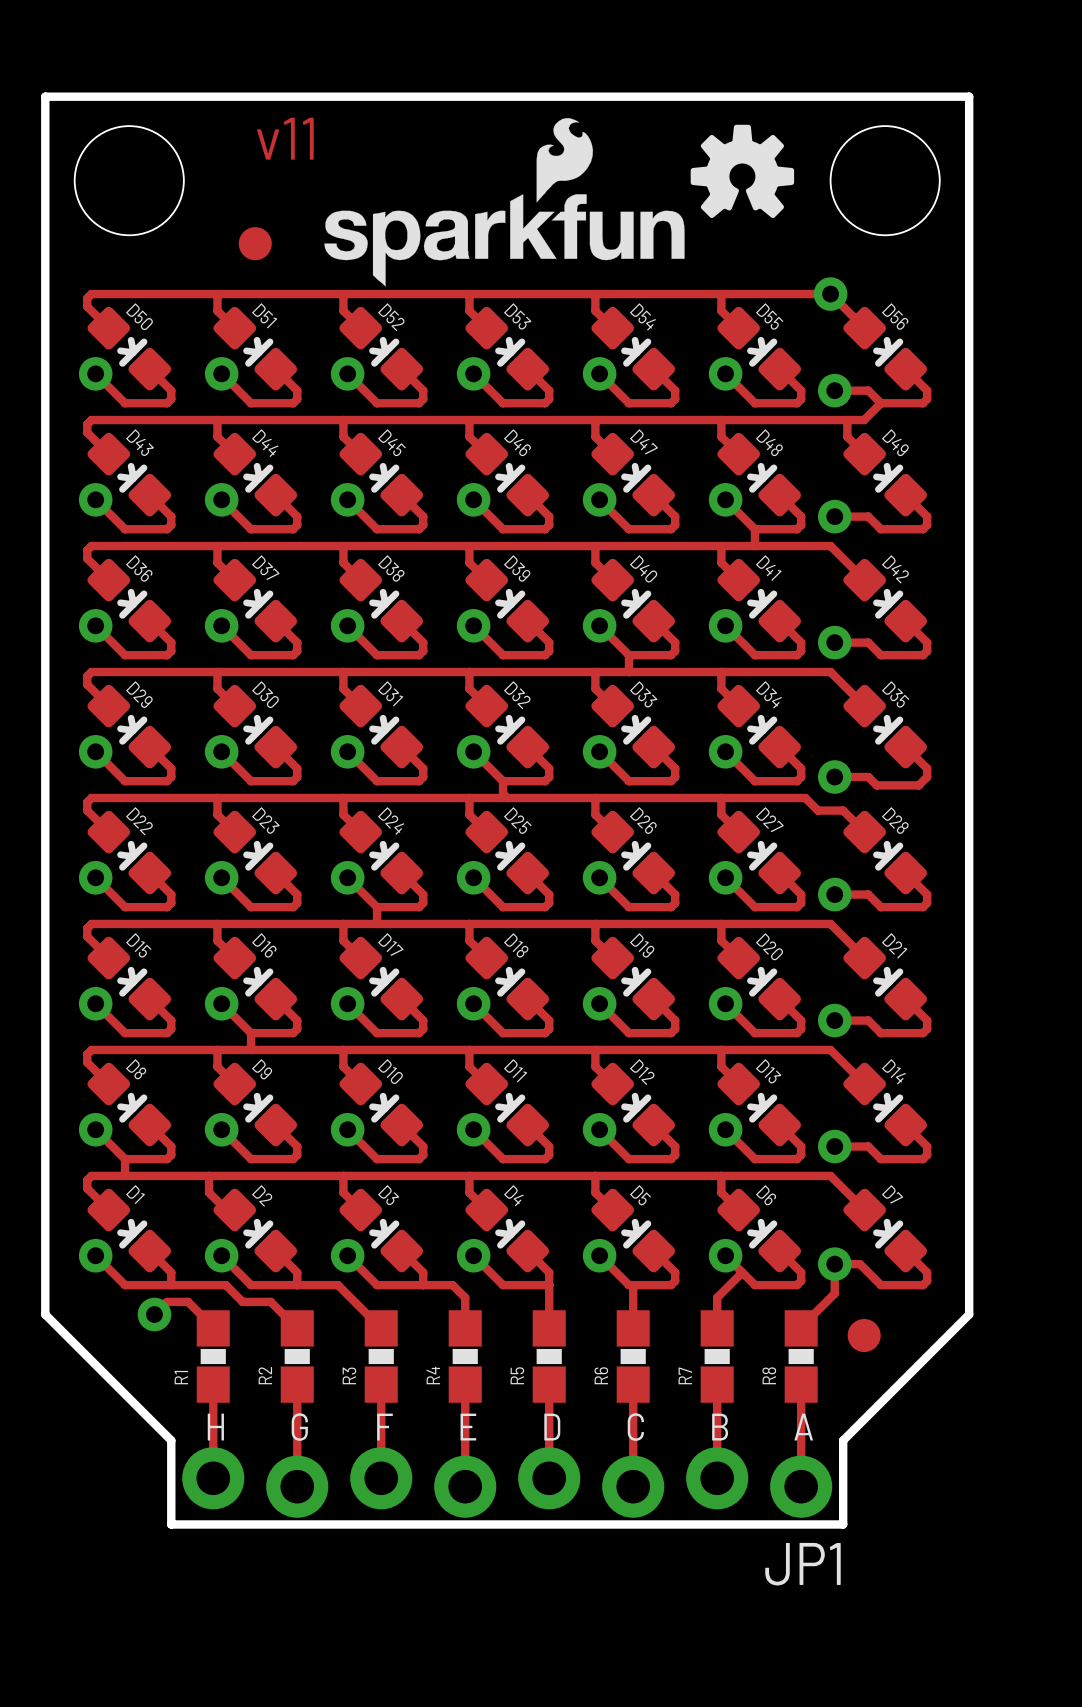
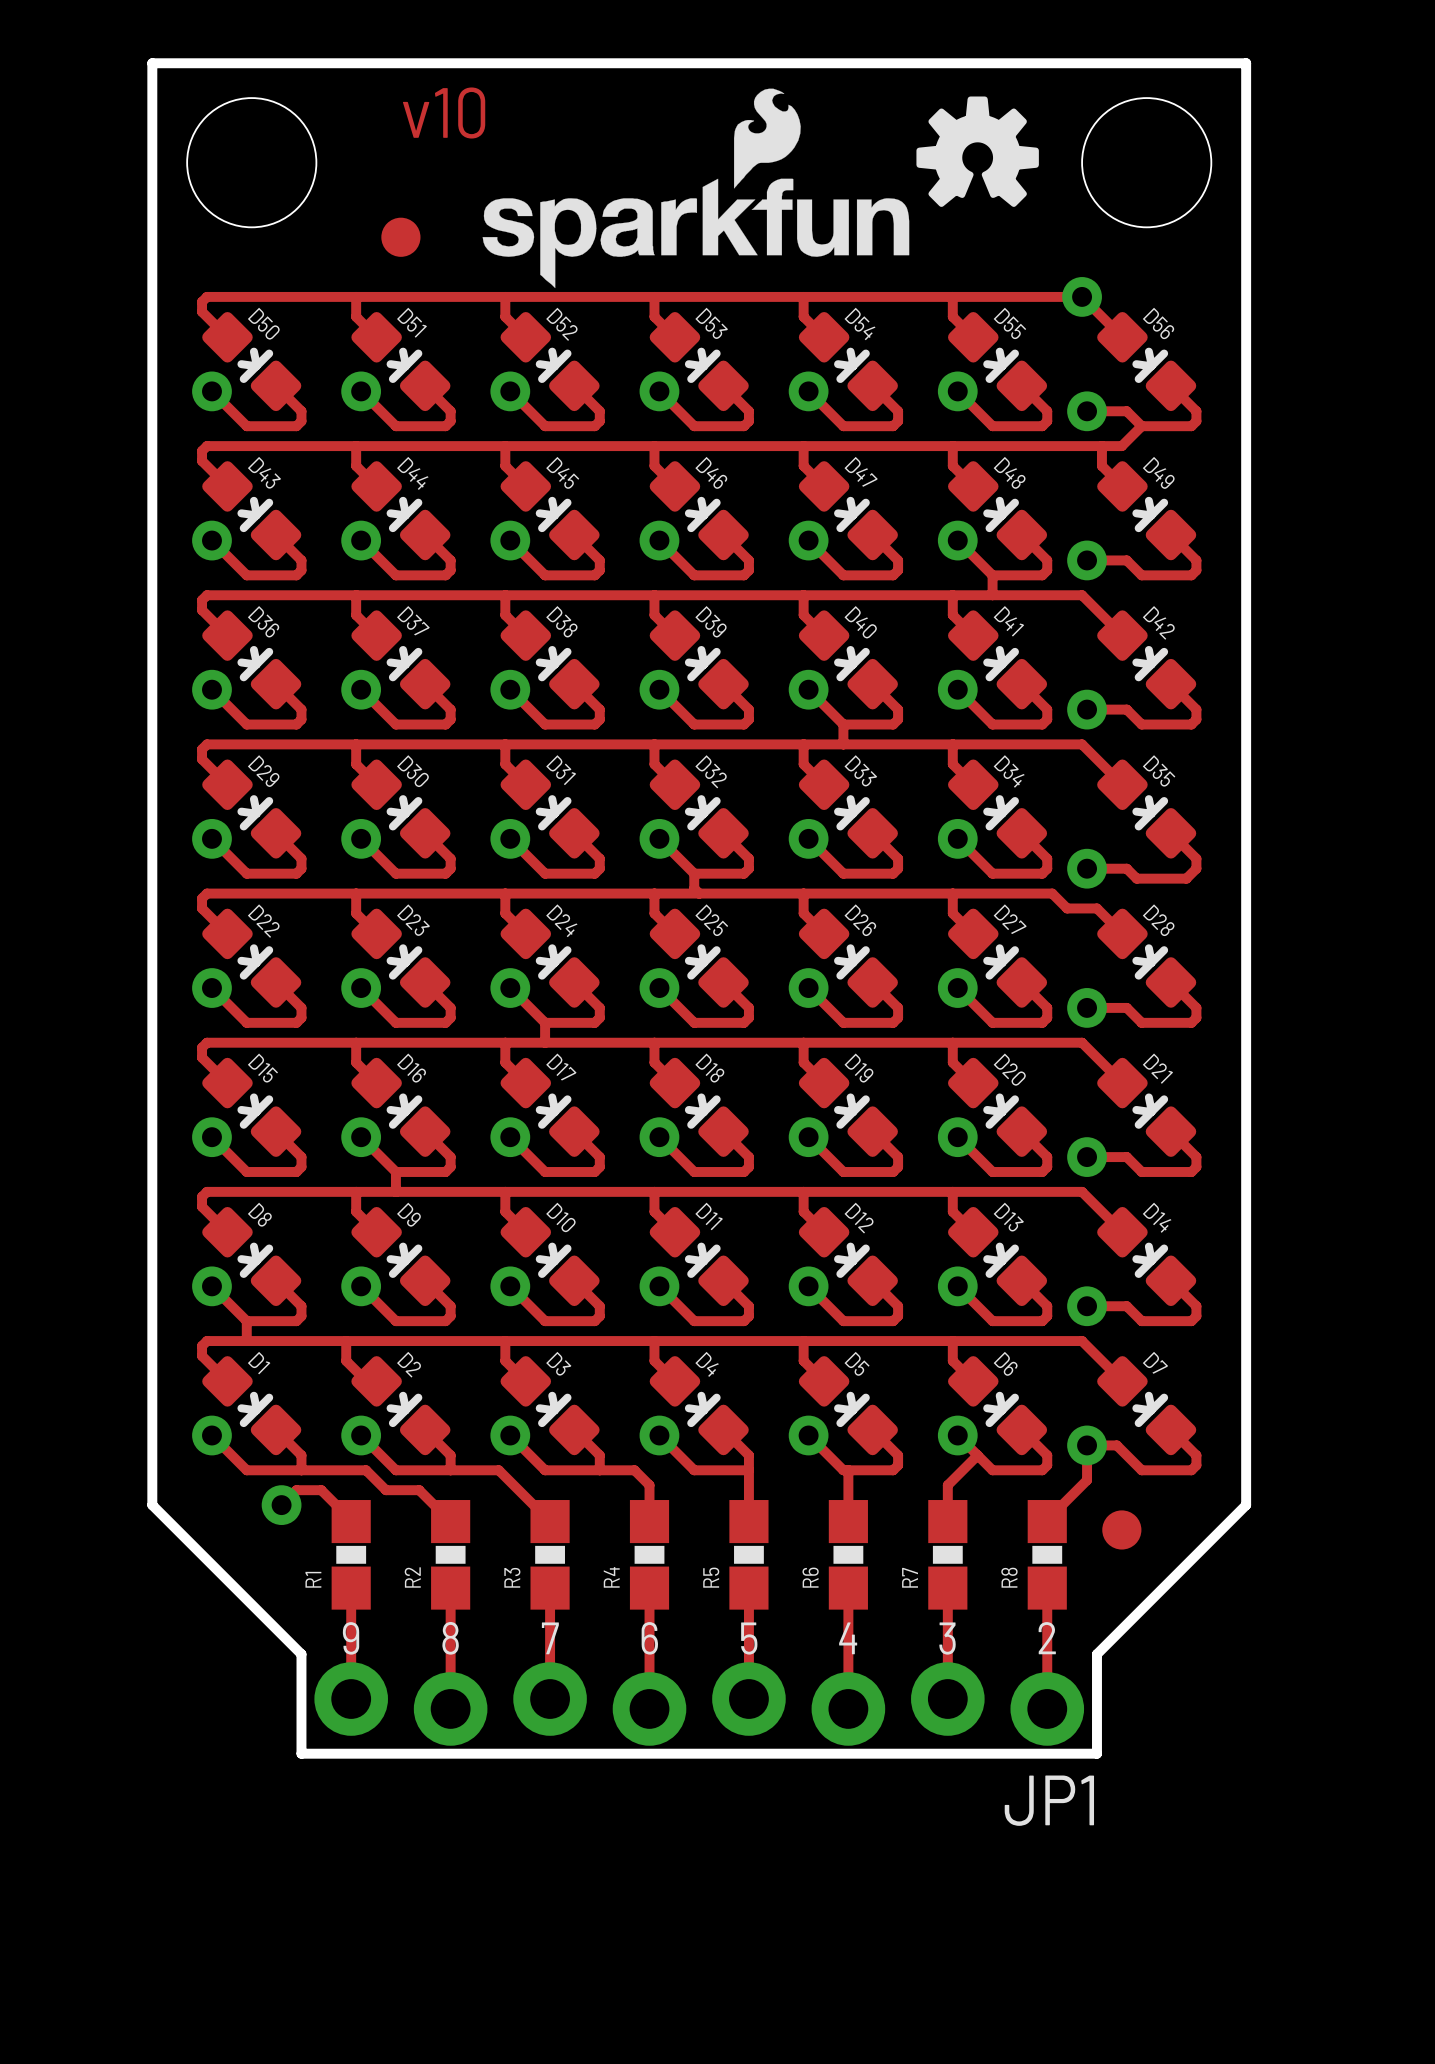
drawing shape: [257, 117, 314, 160] -> [402, 87, 486, 139]
text: H (215, 1427) -> 9 (351, 1638)
text: G (299, 1427) -> 8 (450, 1638)
text: F (385, 1427) -> 7 (550, 1638)
text: E (468, 1427) -> 6 (649, 1638)
text: D (552, 1427) -> 5 (749, 1638)
text: C (635, 1427) -> 4 (848, 1638)
text: B (720, 1427) -> 3 (947, 1638)
text: A (803, 1427) -> 2 (1047, 1638)

